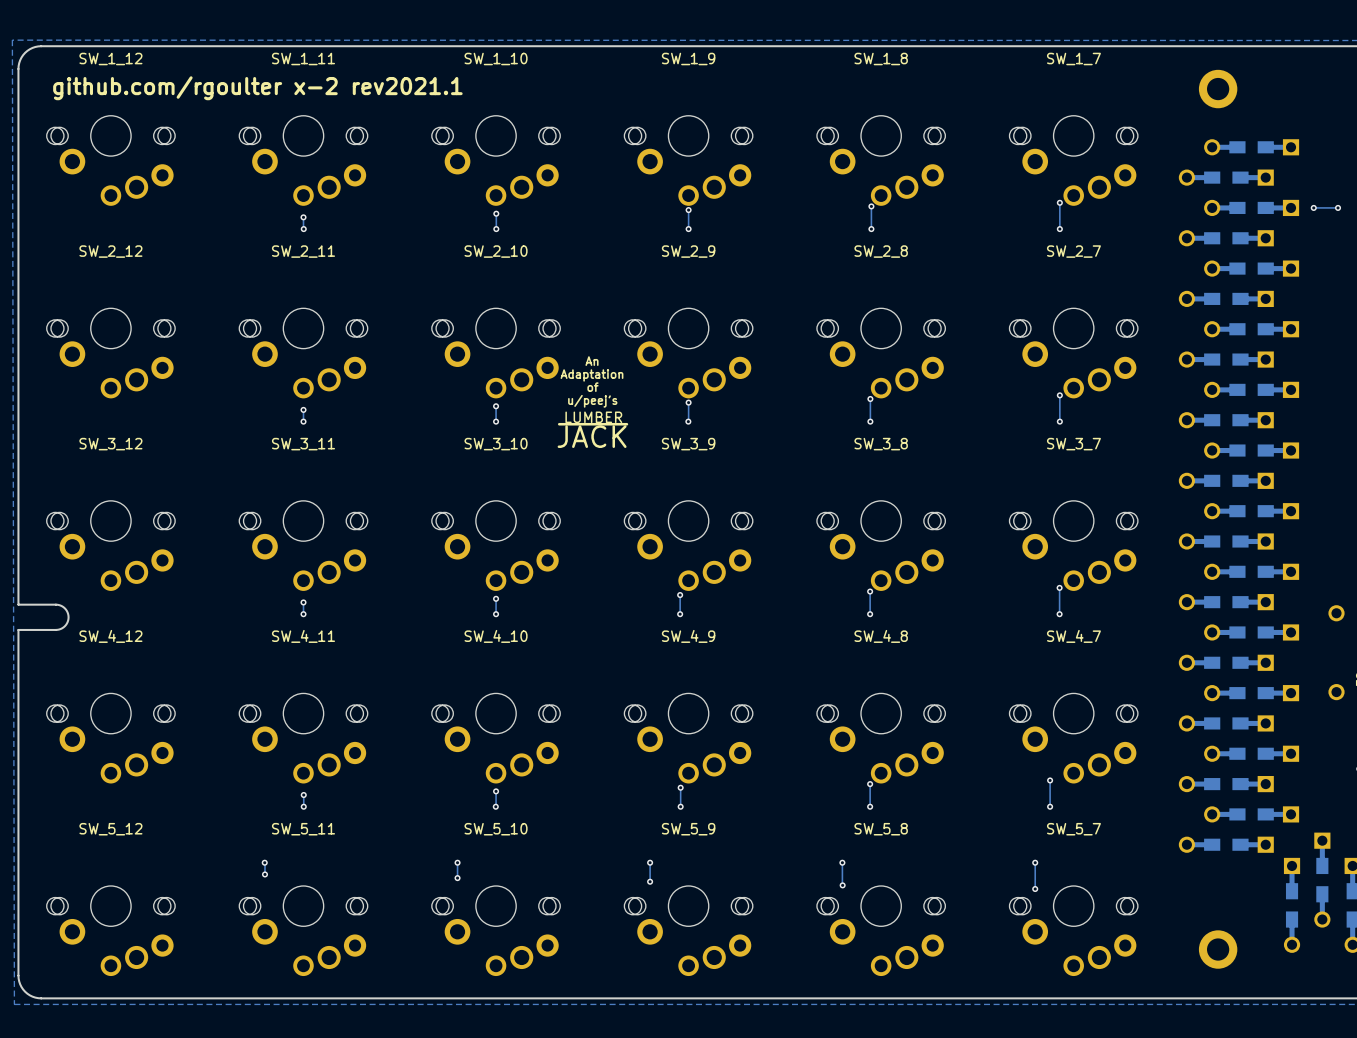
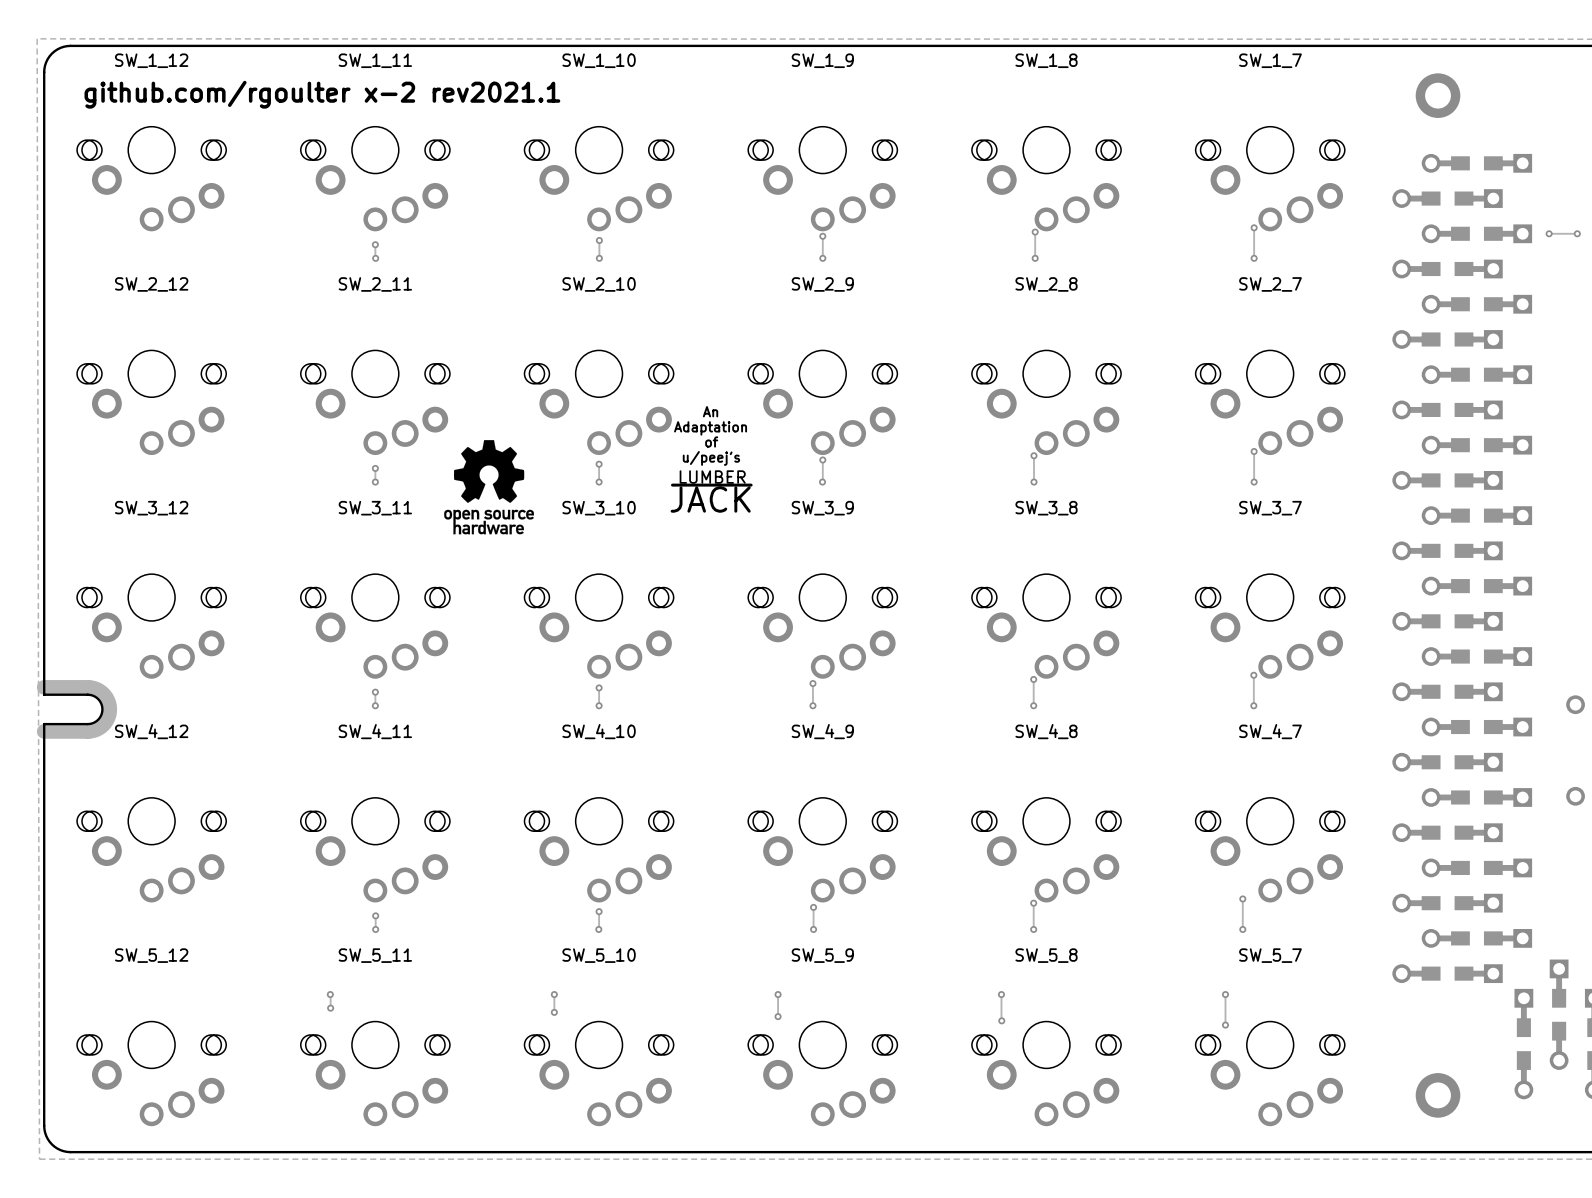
drawing: none -> [444, 440, 534, 535]
drawing: none -> [36, 680, 118, 739]

